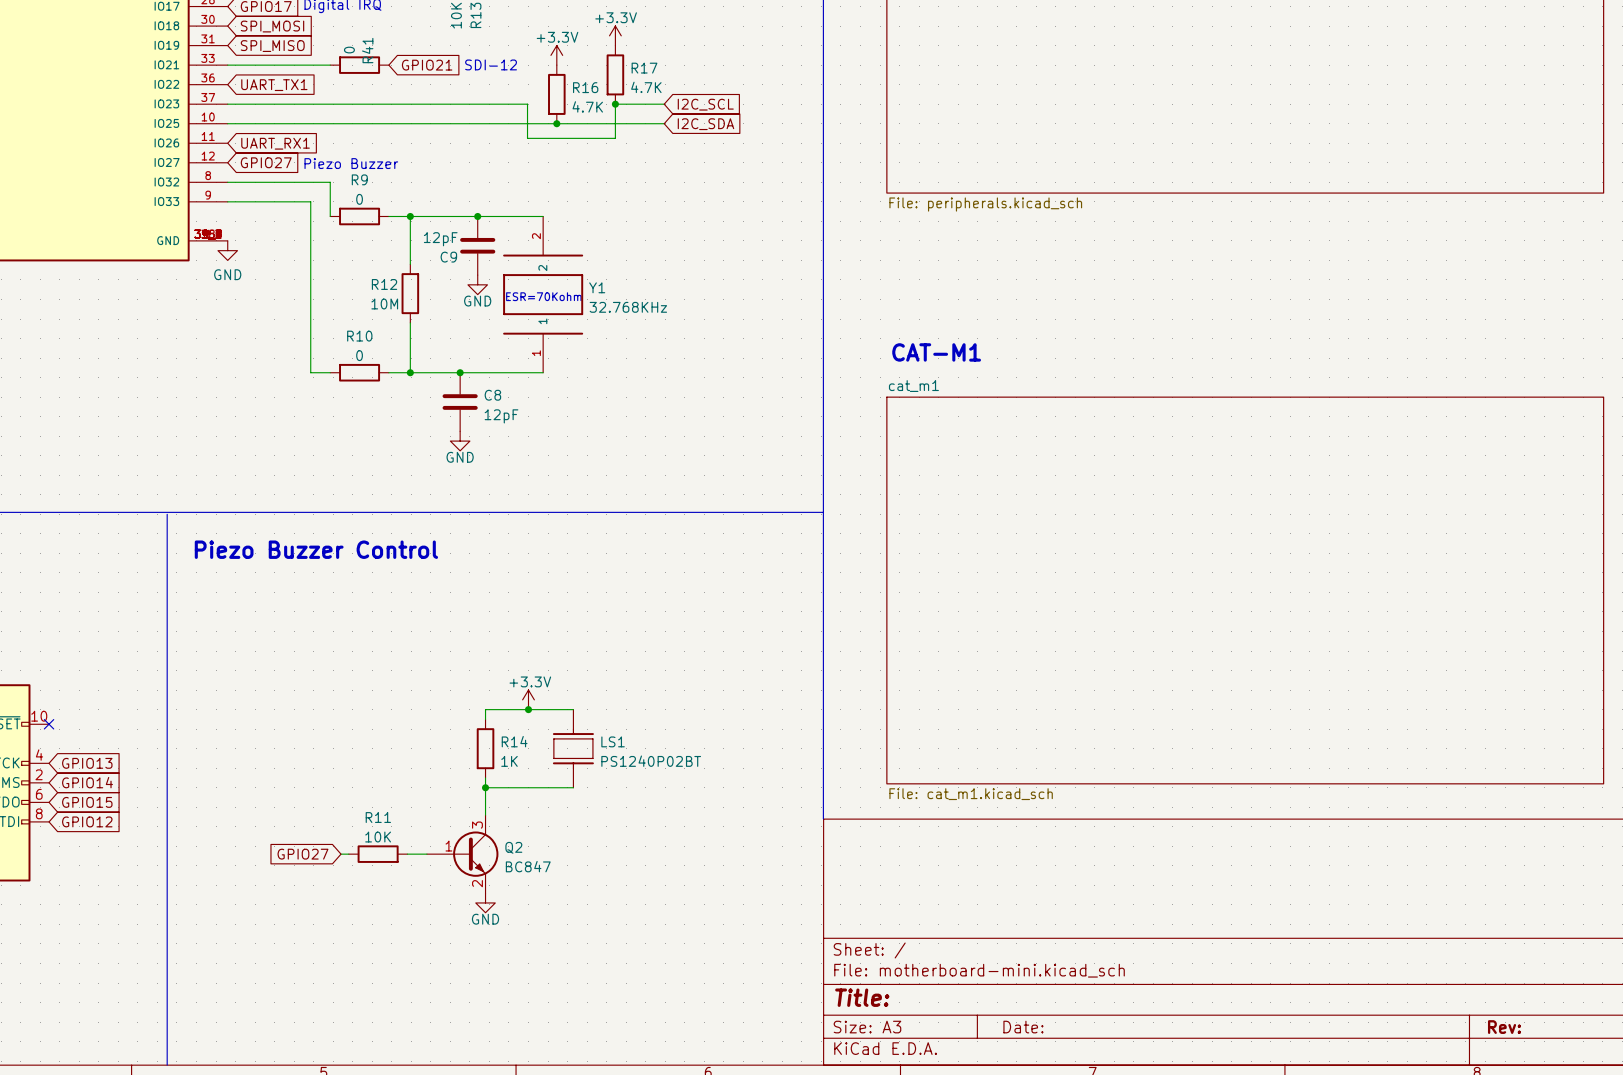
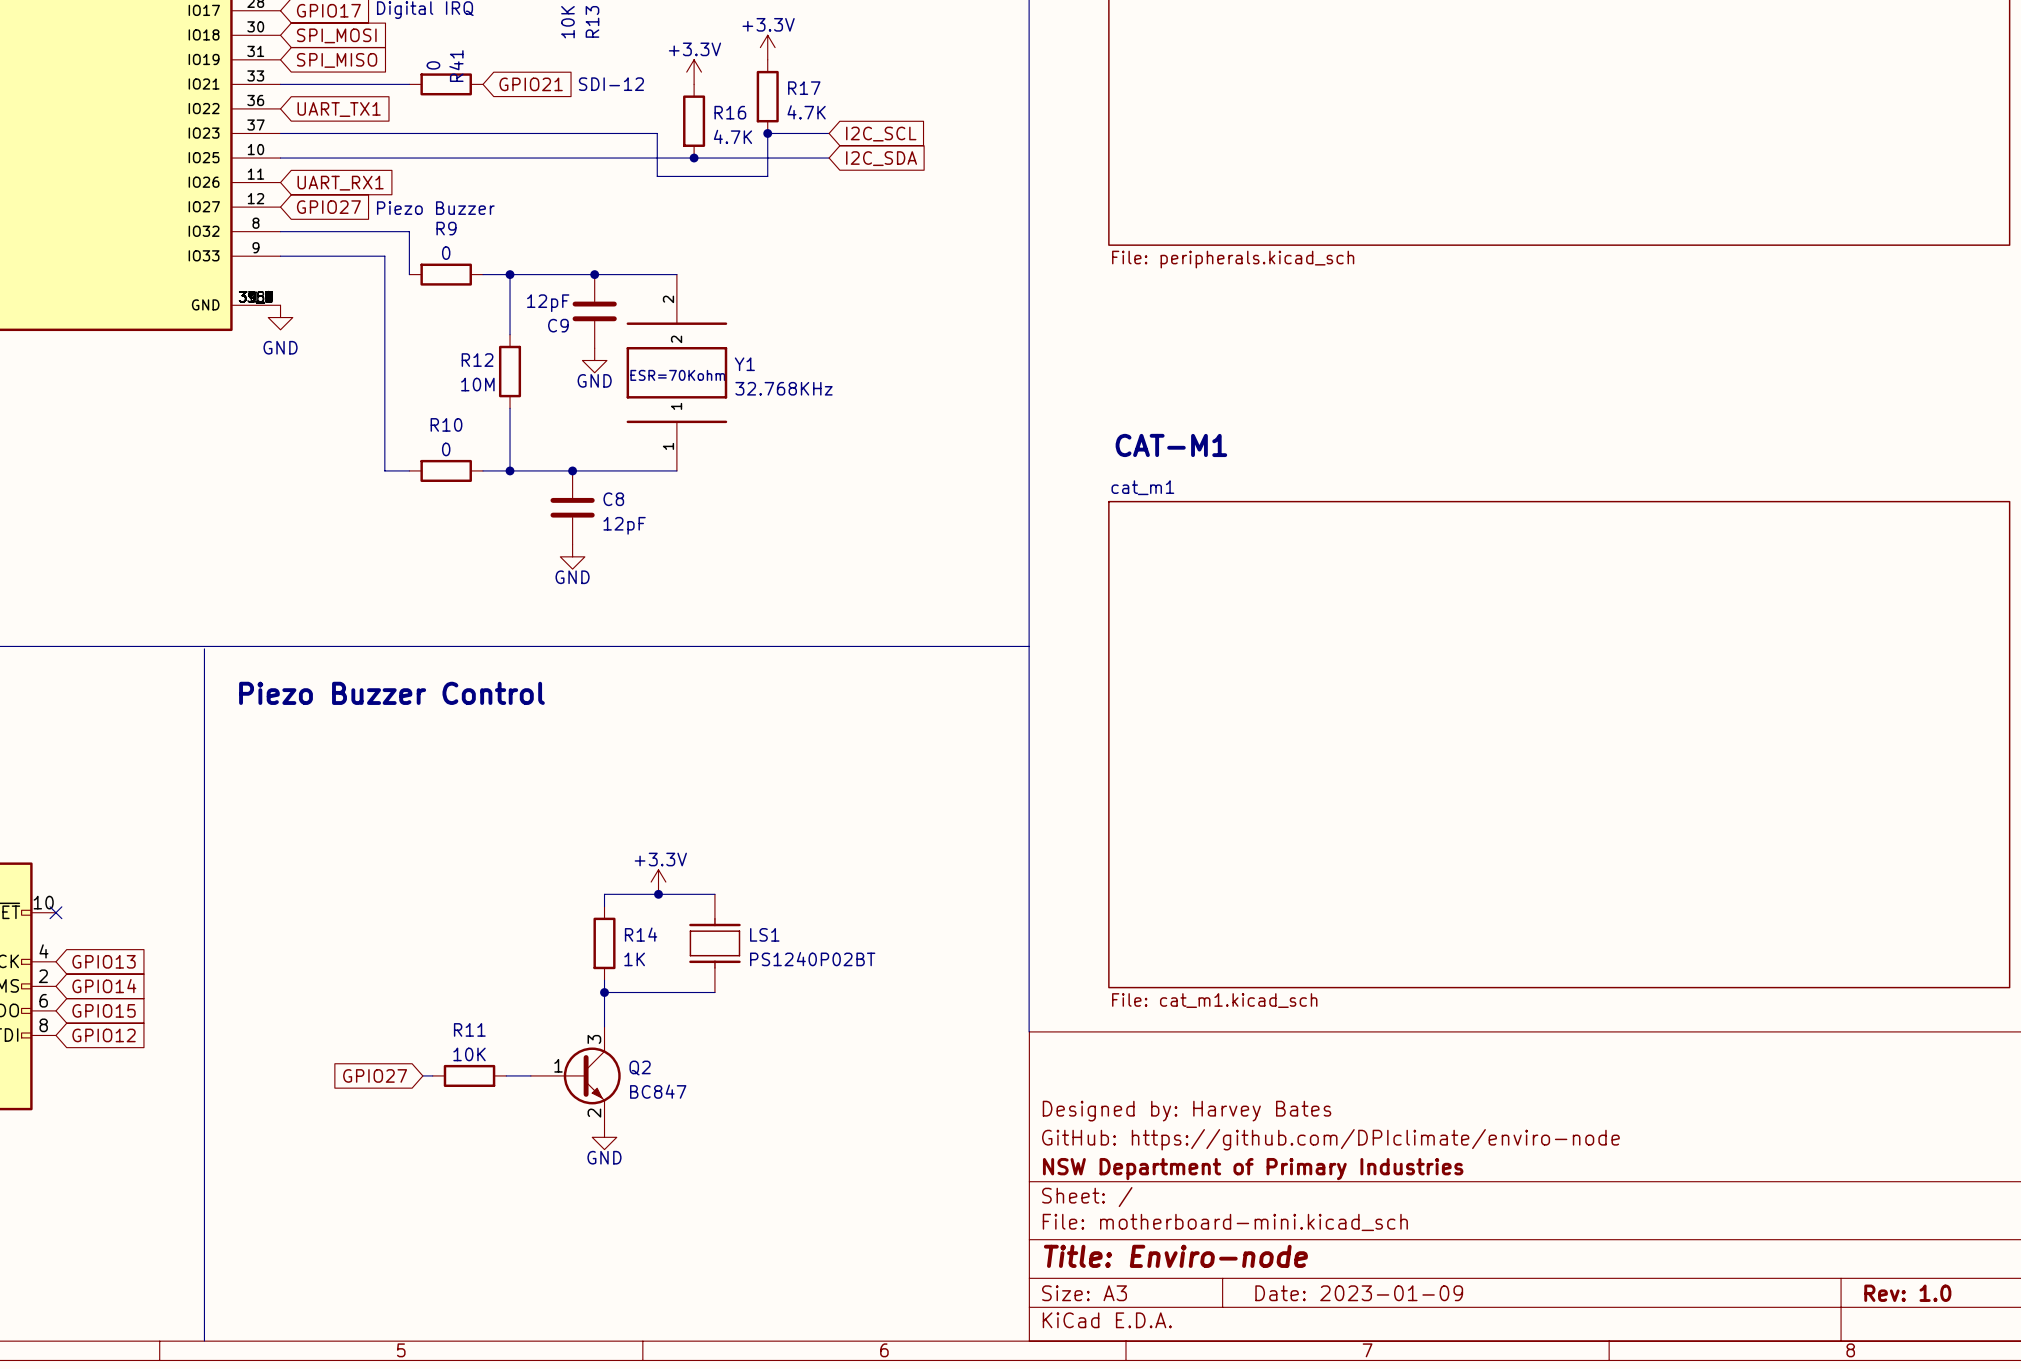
title block: none -> Designed by: Harvey Bates (1187, 1111)
title block: none -> GitHub: https://github.com/DPIclimate/enviro-node (1330, 1139)
title block: none -> NSW Department of Primary Industries (1253, 1169)
title block: Title: (862, 997) -> Title: Enviro-node (1175, 1256)
title block: Date: (1023, 1027) -> Date: 2023-01-09 (1359, 1293)
title block: Rev: (1504, 1027) -> Rev: 1.0 (1907, 1293)

